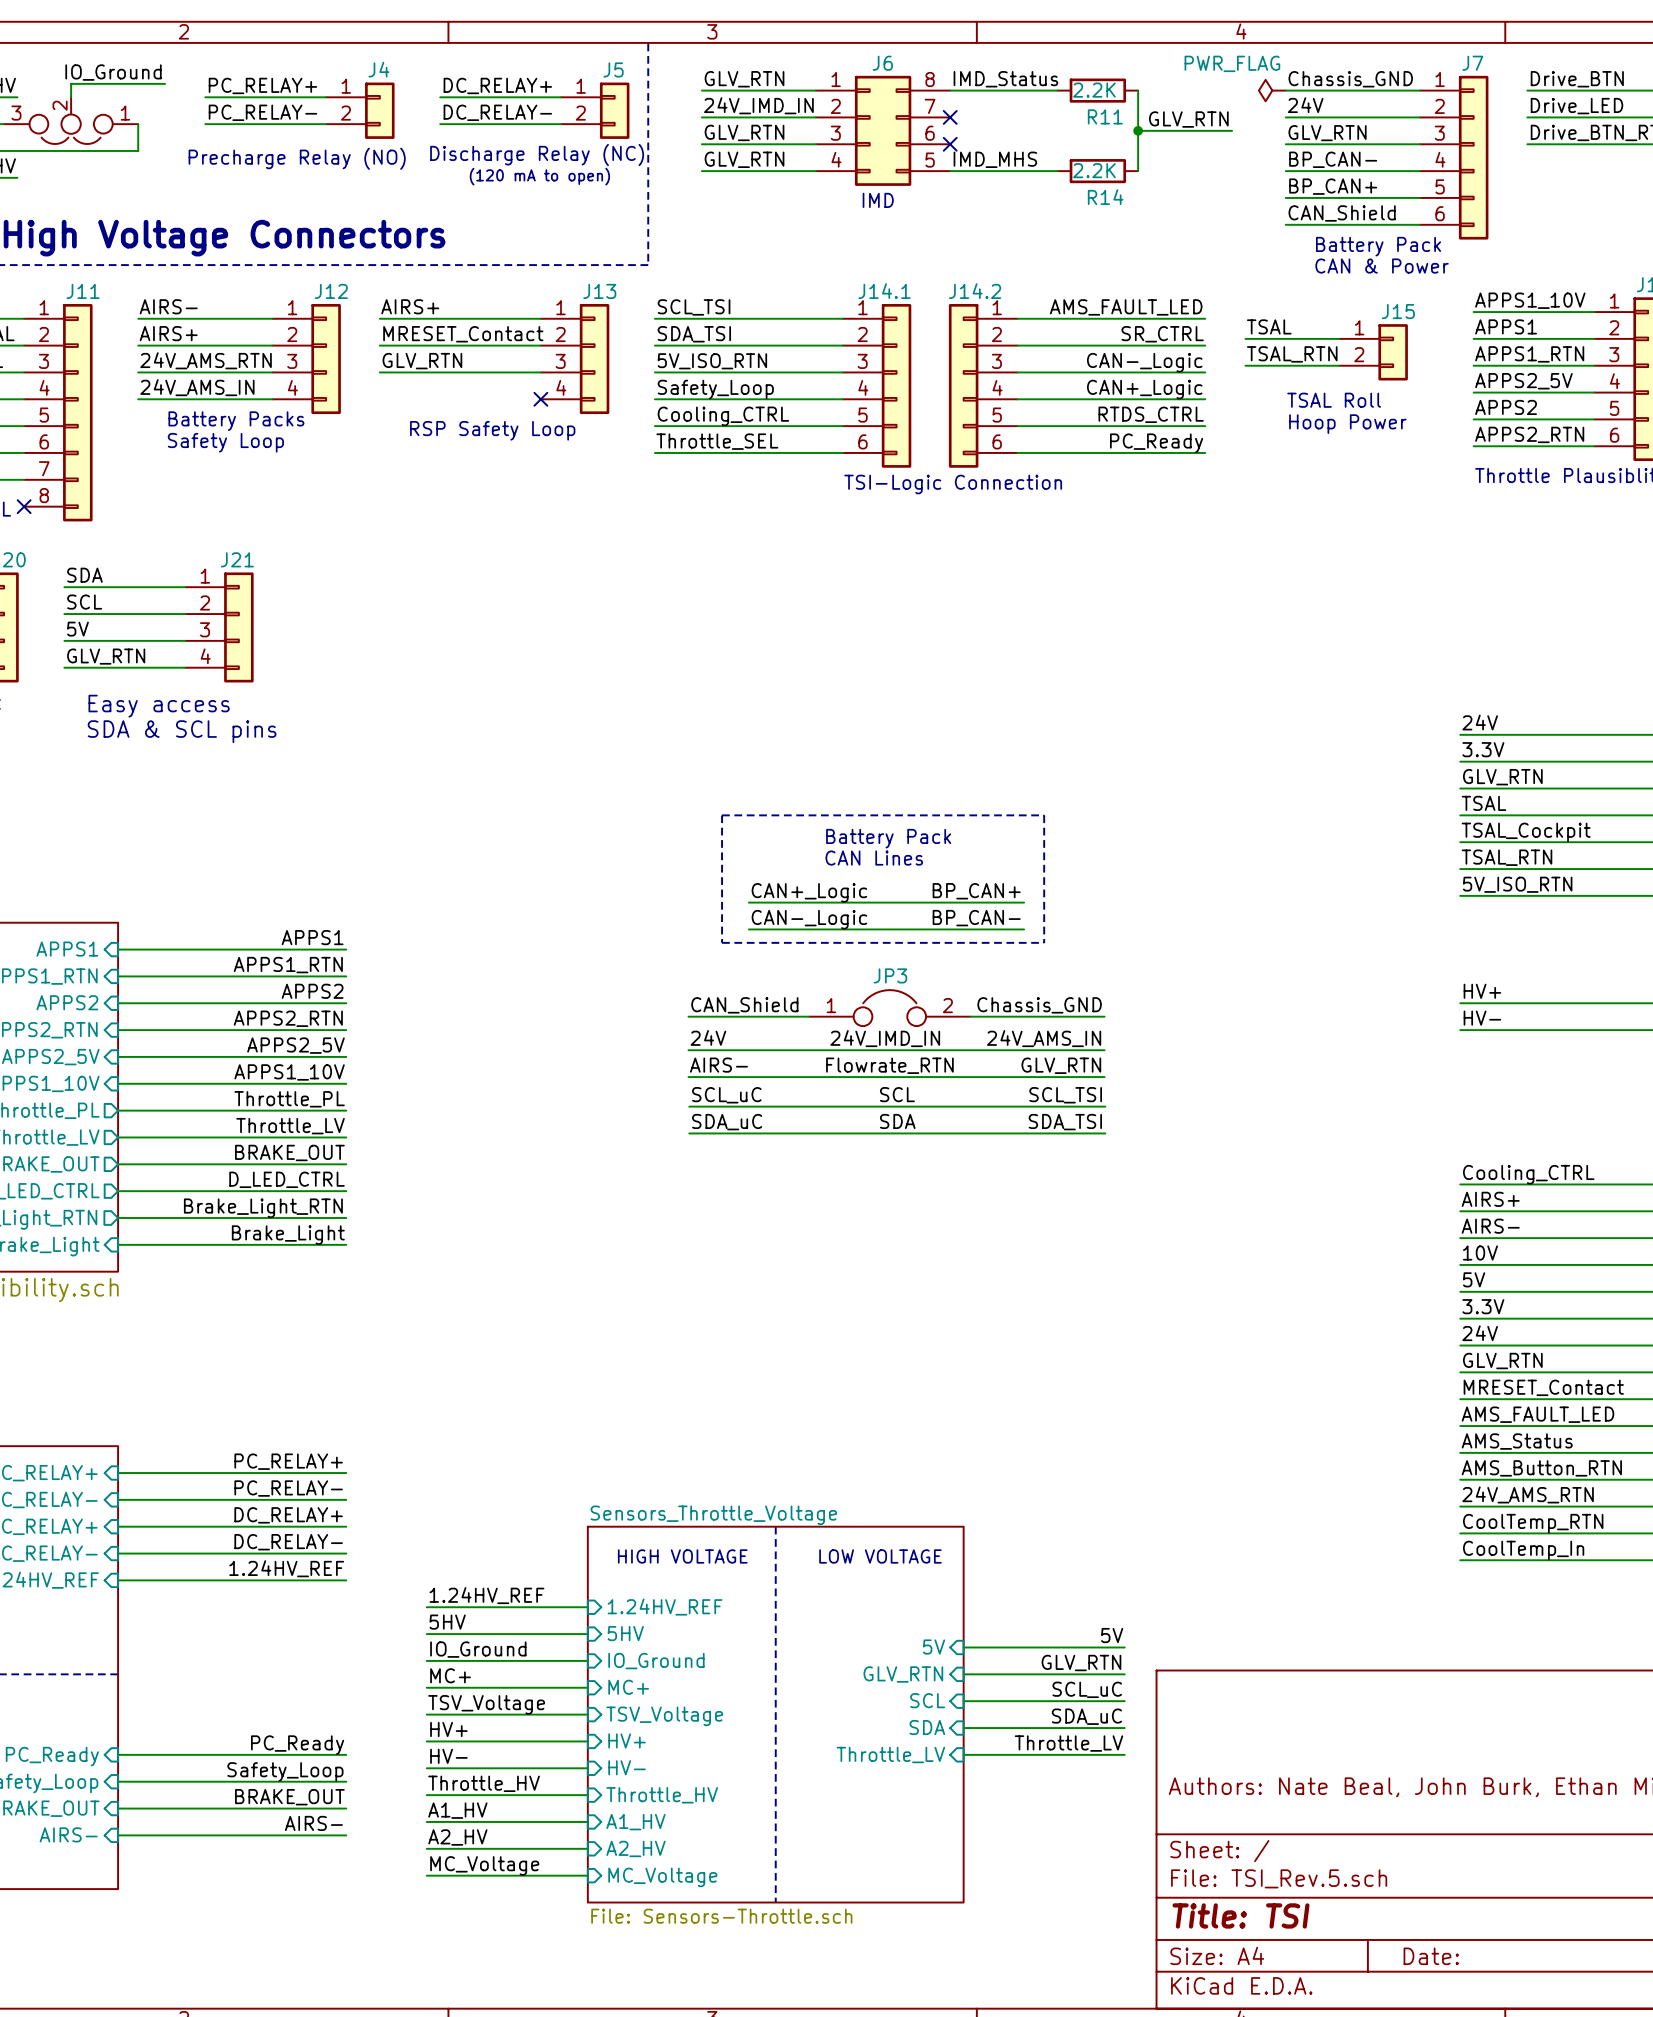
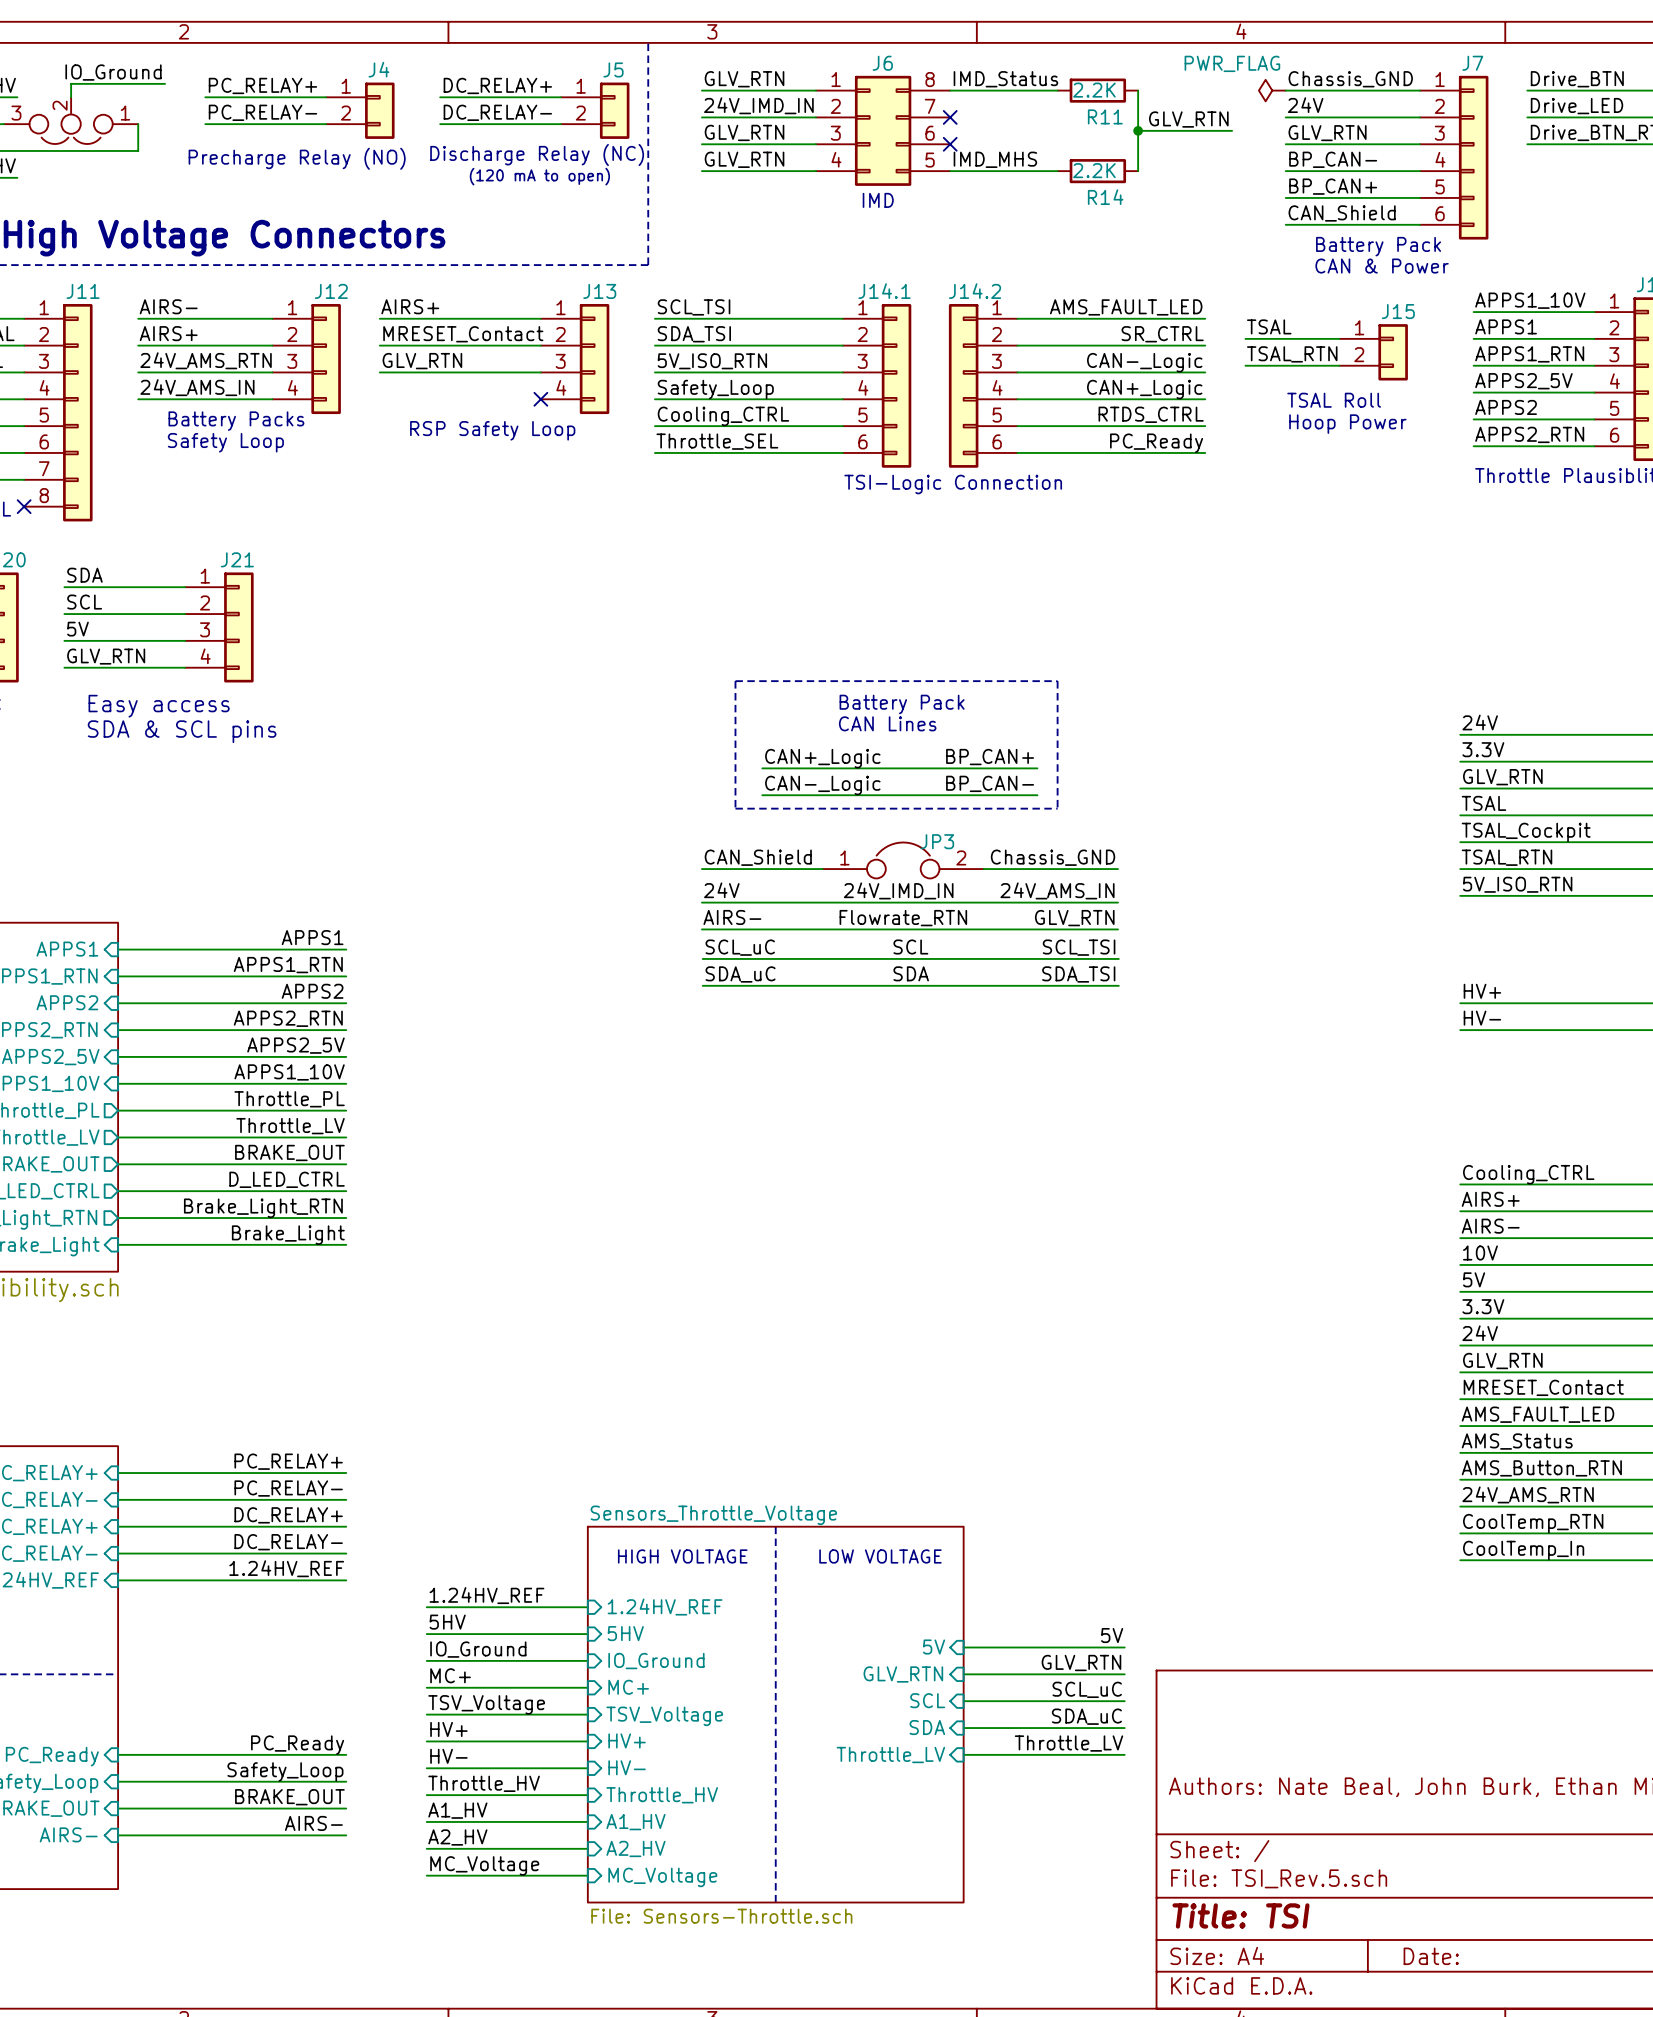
wire: none -> (762, 768) (1037, 768)
wire: none -> (762, 795) (1037, 795)
line: (722, 815) (722, 942) (1044, 942) (1044, 815) (722, 815) -> (735, 681) (735, 808) (1057, 808) (1057, 681) (735, 681)
text position: Battery Pack (888, 838) -> Battery Pack (902, 704)
text position: CAN Lines (874, 858) -> CAN Lines (887, 723)
label position: BP_CAN+ (976, 891) -> BP_CAN+ (990, 757)
label position: CAN+_Logic (809, 892) -> CAN+_Logic (822, 758)
wire: none -> (701, 902) (748, 902)
wire: none -> (1024, 902) (1117, 902)
label position: BP_CAN- (976, 918) -> BP_CAN- (990, 783)
label position: CAN-_Logic (809, 919) -> CAN-_Logic (822, 785)
wire: none -> (701, 929) (748, 929)
wire: none -> (1024, 929) (1117, 929)
JP3 name position: JP3 (890, 975) -> JP3 (937, 841)
label position: CAN_Shield (744, 1005) -> CAN_Shield (758, 857)
label position: Chassis_GND (1039, 1005) -> Chassis_GND (1053, 857)
JP3 position: (889, 1008) -> (903, 860)
wire: (688, 1016) (809, 1016) -> (701, 869) (822, 869)
wire: (970, 1016) (1104, 1016) -> (983, 869) (1117, 869)
label position: 24V (708, 1037) -> 24V (721, 890)
label position: 24V_IMD_IN (885, 1038) -> 24V_IMD_IN (898, 890)
label position: 24V_AMS_IN (1044, 1038) -> 24V_AMS_IN (1057, 890)
wire: (688, 1050) (1104, 1050) -> none
label position: AIRS- (718, 1065) -> AIRS- (732, 917)
label position: Flowrate_RTN (889, 1065) -> Flowrate_RTN (903, 918)
label position: GLV_RTN (1061, 1065) -> GLV_RTN (1074, 918)
wire: (688, 1077) (1104, 1077) -> none
label position: SCL (897, 1094) -> SCL (910, 946)
label position: SCL_uC (726, 1095) -> SCL_uC (740, 947)
label position: SCL_TSI (1065, 1095) -> SCL_TSI (1079, 947)
wire: (689, 1106) (1105, 1106) -> (702, 958) (1118, 958)
label position: SDA (897, 1121) -> SDA (911, 973)
label position: SDA_uC (727, 1122) -> SDA_uC (740, 974)
label position: SDA_TSI (1065, 1122) -> SDA_TSI (1078, 974)
wire: (689, 1133) (1105, 1133) -> (702, 985) (1118, 985)

